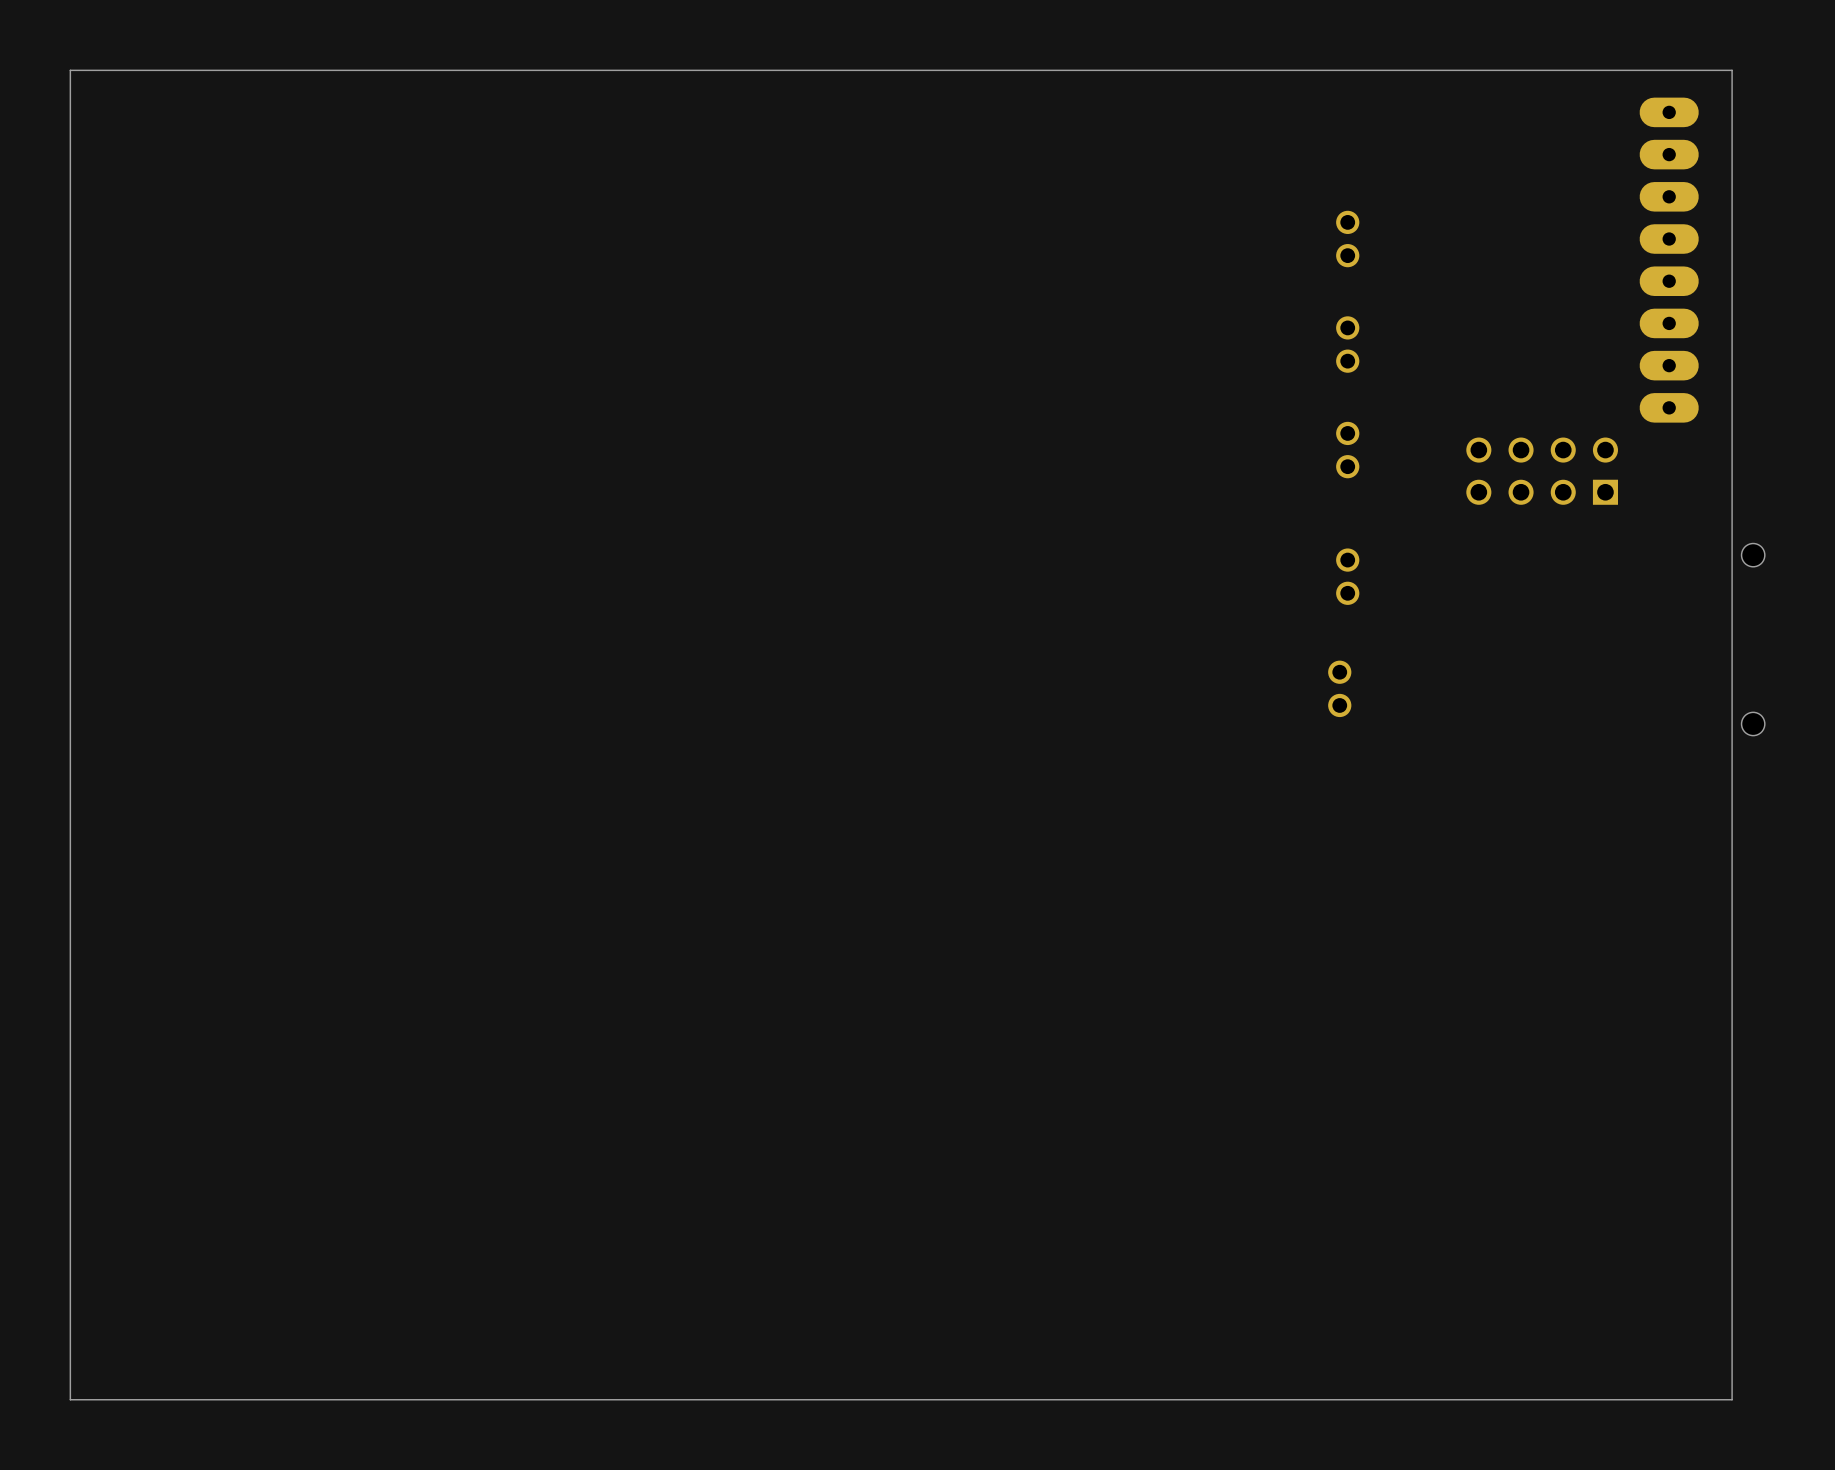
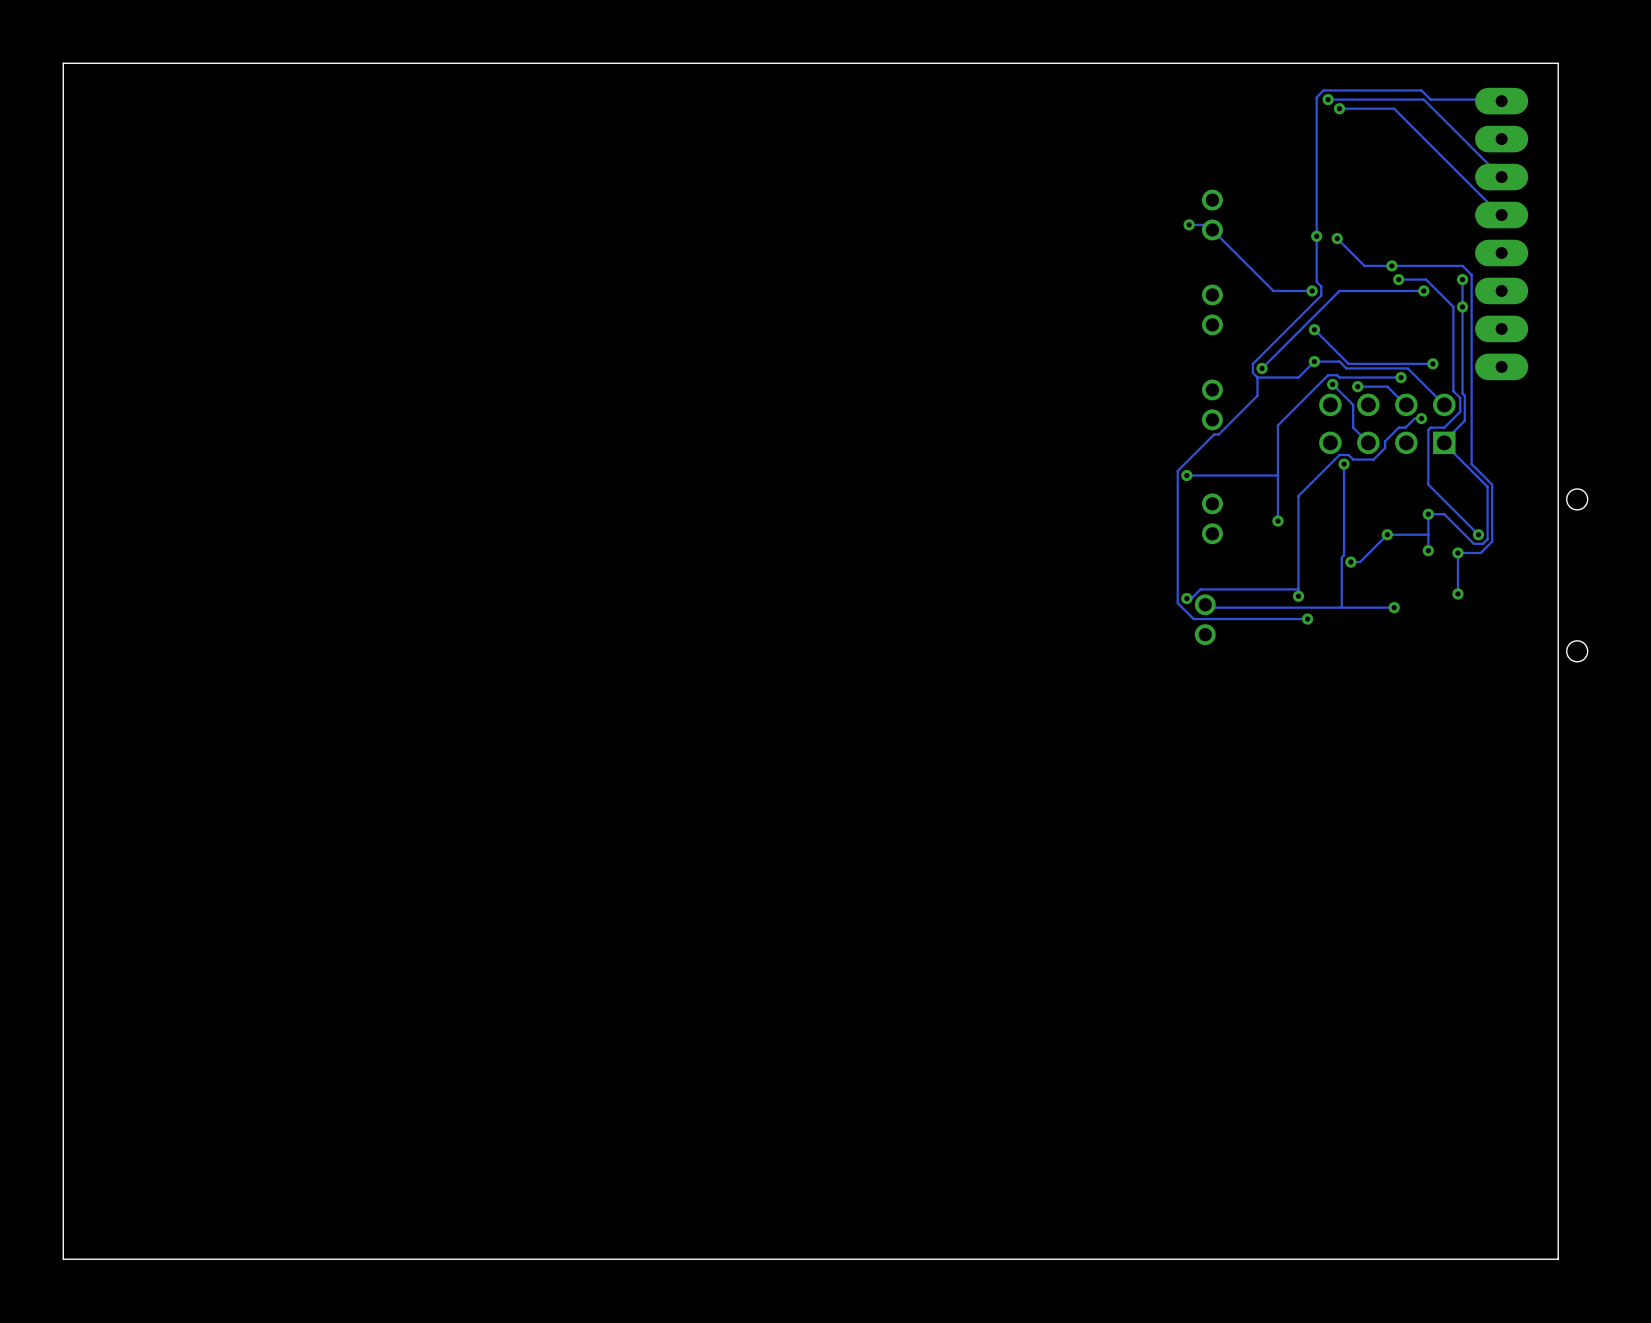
track: none -> (1328, 99) (1423, 99) (1501, 177)
via: none -> (1328, 99)
track: none -> (1501, 101) (1501, 99) (1430, 99) (1421, 90) (1323, 90) (1316, 97) (1316, 281) (1321, 286) (1321, 295) (1252, 363) (1252, 372) (1257, 377)
track: none -> (1339, 108) (1394, 108) (1501, 215)
via: none -> (1339, 108)
track: none -> (1189, 224) (1207, 224) (1273, 290) (1312, 290)
via: none -> (1189, 224)
via: none -> (1316, 236)
track: none -> (1337, 238) (1364, 265) (1462, 265) (1471, 275) (1471, 464) (1492, 484) (1492, 541) (1480, 552) (1457, 552) (1457, 593)
via: none -> (1337, 238)
via: none -> (1391, 265)
track: none -> (1398, 279) (1426, 279) (1453, 306) (1453, 391) (1460, 398) (1460, 411) (1444, 427) (1430, 427) (1428, 429) (1428, 484) (1478, 534)
via: none -> (1398, 279)
track: none -> (1462, 279) (1462, 393) (1464, 395) (1464, 420) (1444, 441) (1444, 443) (1487, 486) (1487, 539) (1483, 543) (1473, 543) (1444, 514) (1428, 514) (1428, 550)
via: none -> (1462, 279)
via: none -> (1312, 290)
track: none -> (1423, 290) (1339, 290) (1262, 368)
via: none -> (1423, 290)
via: none -> (1462, 306)
track: none -> (1314, 329) (1348, 363) (1432, 363)
via: none -> (1314, 329)
via: none -> (1314, 361)
via: none -> (1432, 363)
via: none -> (1262, 368)
track: none -> (1257, 377) (1298, 377) (1314, 361) (1339, 361) (1346, 368) (1407, 368) (1444, 404)
track: none -> (1257, 377) (1257, 395) (1218, 434) (1214, 434) (1177, 470) (1177, 603) (1193, 619) (1307, 619)
track: none -> (1401, 377) (1339, 377) (1337, 375) (1328, 375) (1277, 425) (1277, 521)
via: none -> (1401, 377)
track: none -> (1332, 384) (1353, 404) (1353, 427) (1368, 442)
via: none -> (1332, 384)
track: none -> (1357, 386) (1387, 386) (1406, 404)
via: none -> (1357, 386)
track: none -> (1421, 418) (1414, 418) (1405, 427) (1398, 427) (1385, 441) (1385, 448) (1373, 459) (1353, 459) (1348, 455) (1339, 455) (1298, 496) (1298, 596)
via: none -> (1421, 418)
track: none -> (1344, 464) (1341, 607)
via: none -> (1344, 464)
via: none -> (1186, 475)
track: none -> (1277, 475) (1186, 475)
via: none -> (1428, 514)
via: none -> (1277, 521)
via: none -> (1387, 534)
track: none -> (1428, 534) (1387, 534) (1360, 562) (1350, 562)
via: none -> (1478, 534)
via: none -> (1428, 550)
via: none -> (1457, 552)
via: none -> (1350, 562)
track: none -> (1298, 589) (1200, 589) (1191, 598) (1186, 598)
via: none -> (1457, 593)
via: none -> (1298, 596)
via: none -> (1186, 598)
track: none -> (1205, 604) (1209, 607) (1394, 607)
via: none -> (1394, 607)
via: none -> (1307, 619)

